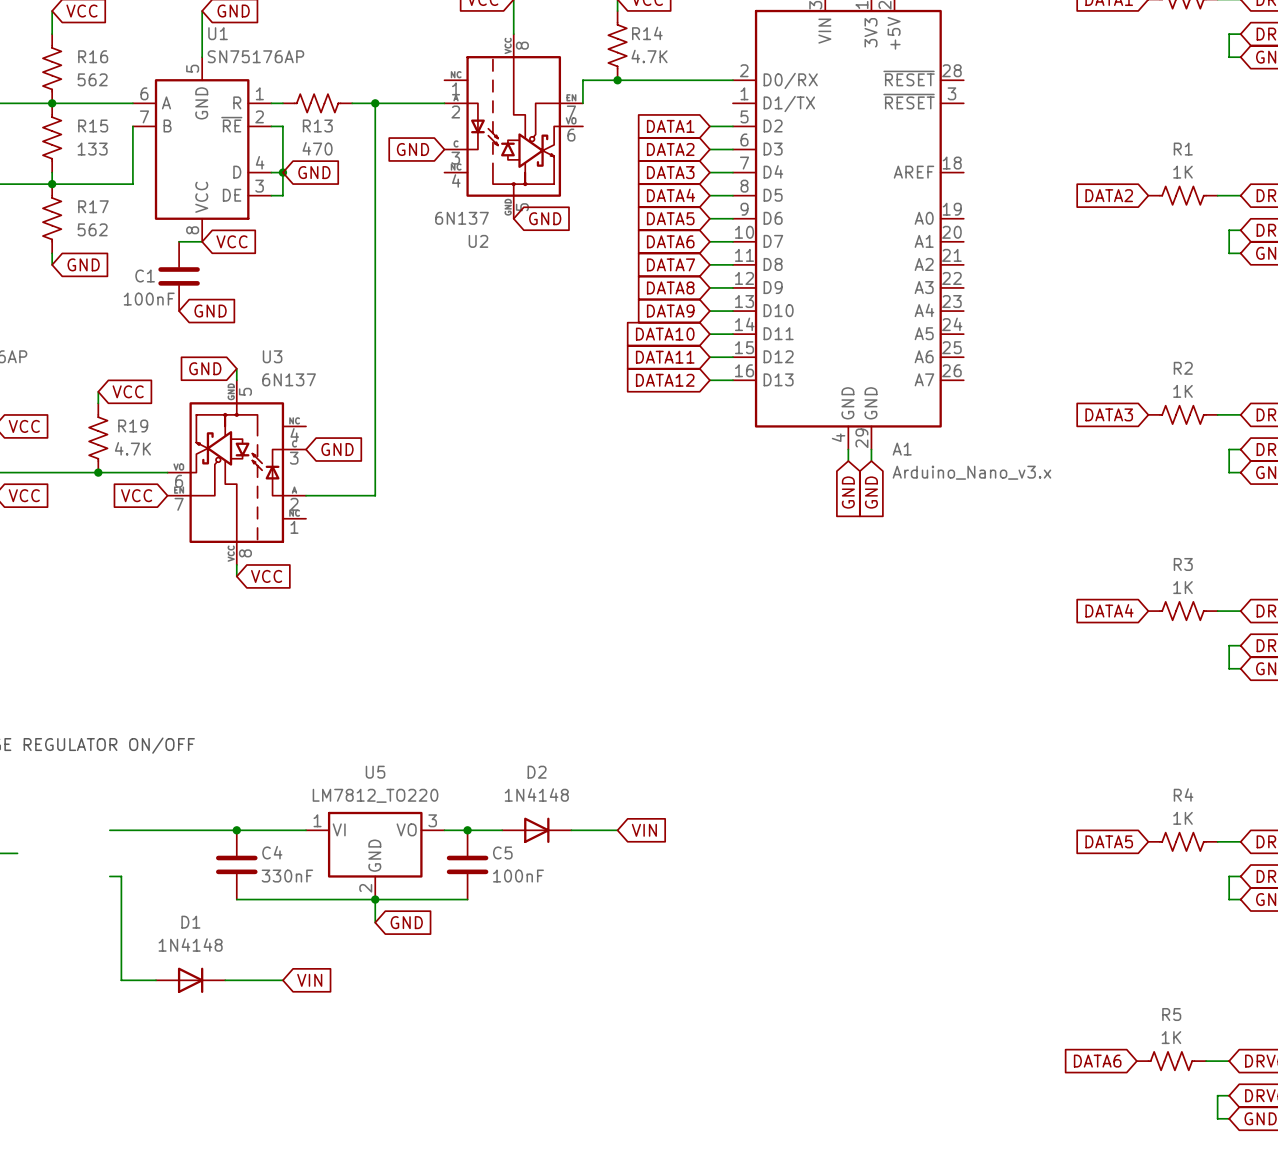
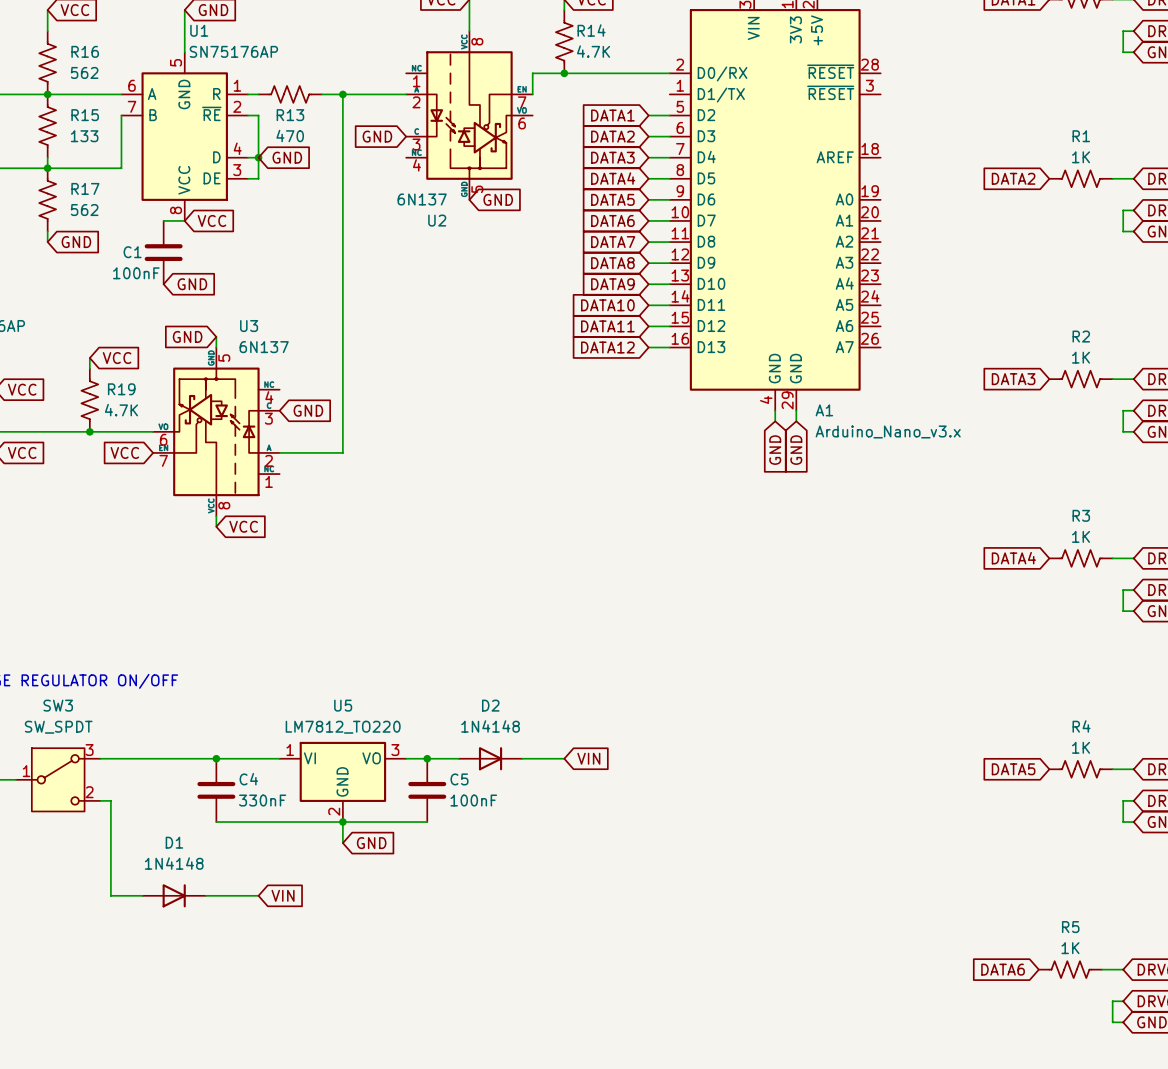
SW3: none -> SW_SPDT (58, 779)

